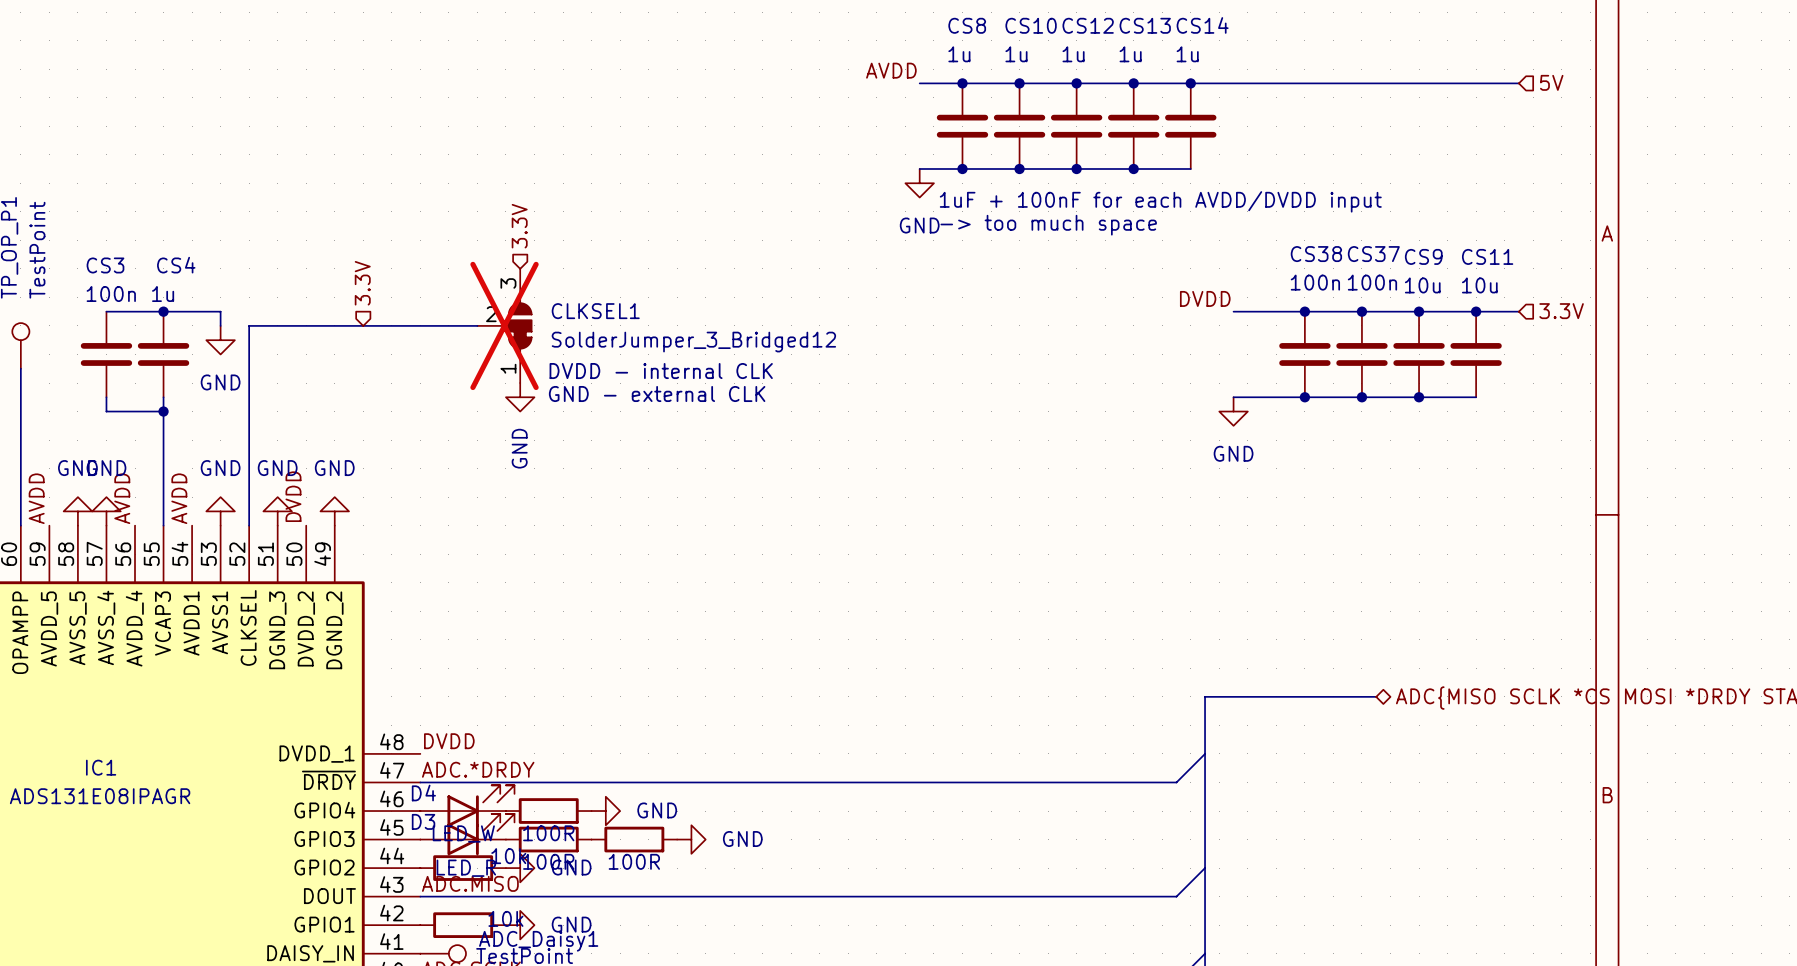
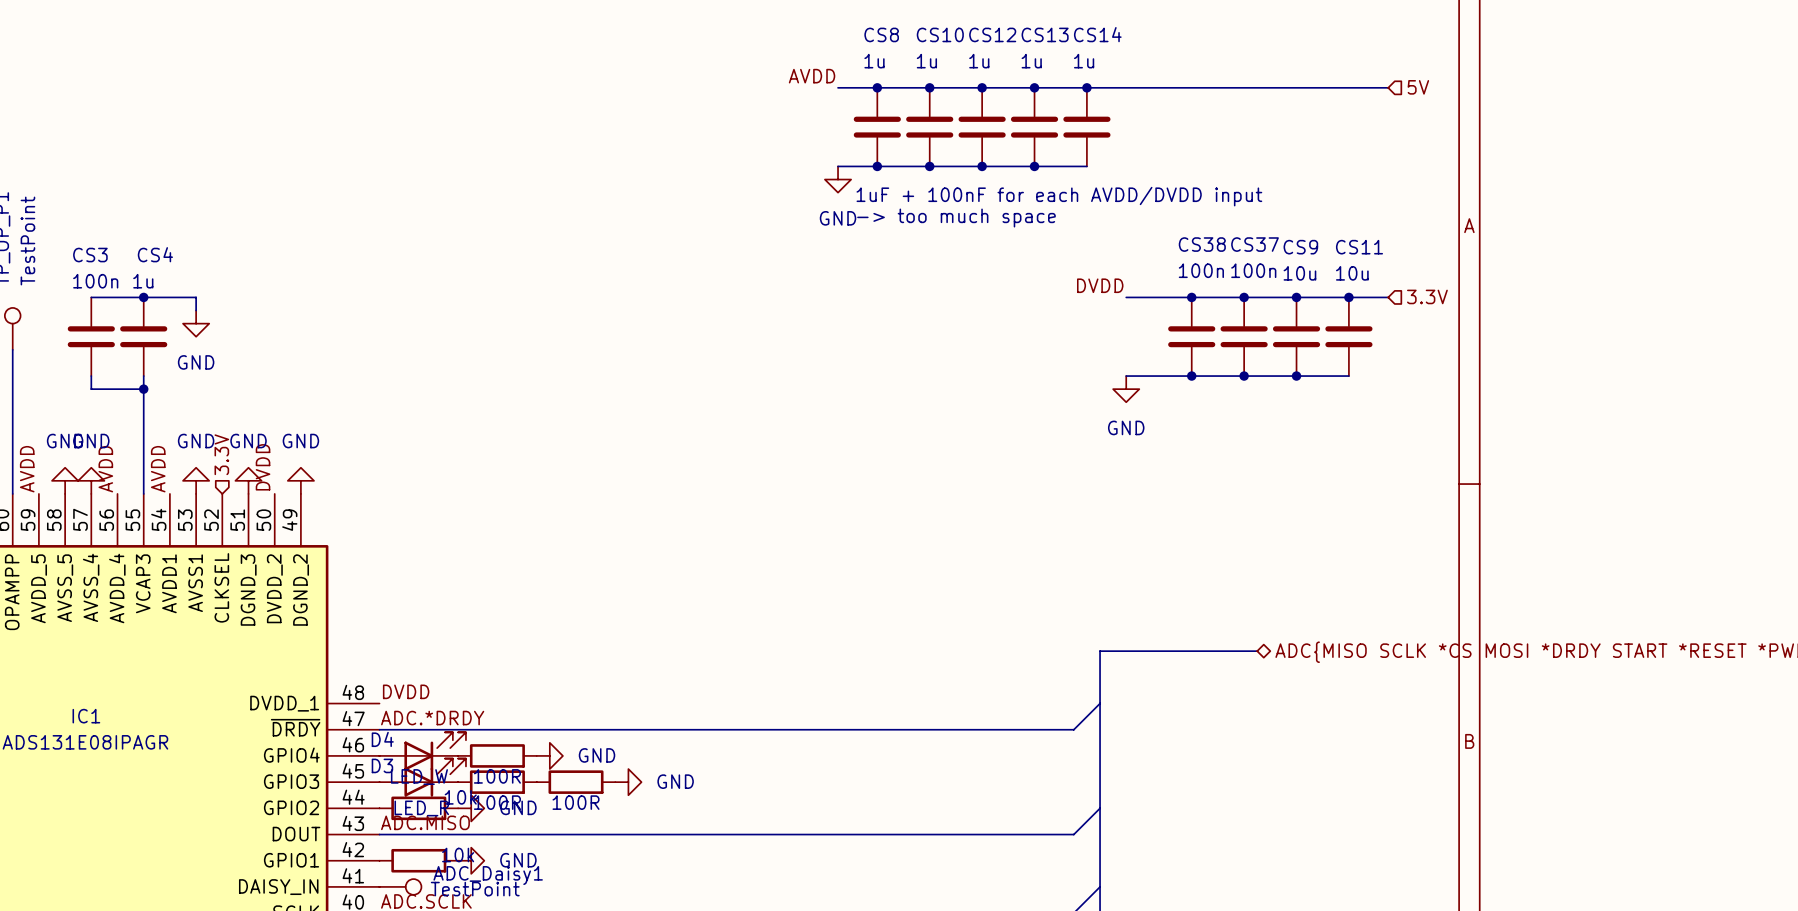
hierarchical label: 3.3V (519, 226) -> none
hierarchical label: 3.3V (362, 283) -> none
wire: (477, 325) (249, 325) (249, 525) -> none
CLKSEL1: SolderJumper_3_Bridged12 (504, 325) -> none
text: DVDD - internal CLK (661, 371) -> none
text: GND - external CLK (657, 394) -> none
power symbol: GND (520, 397) -> none
hierarchical label: none -> 3.3V (221, 454)

